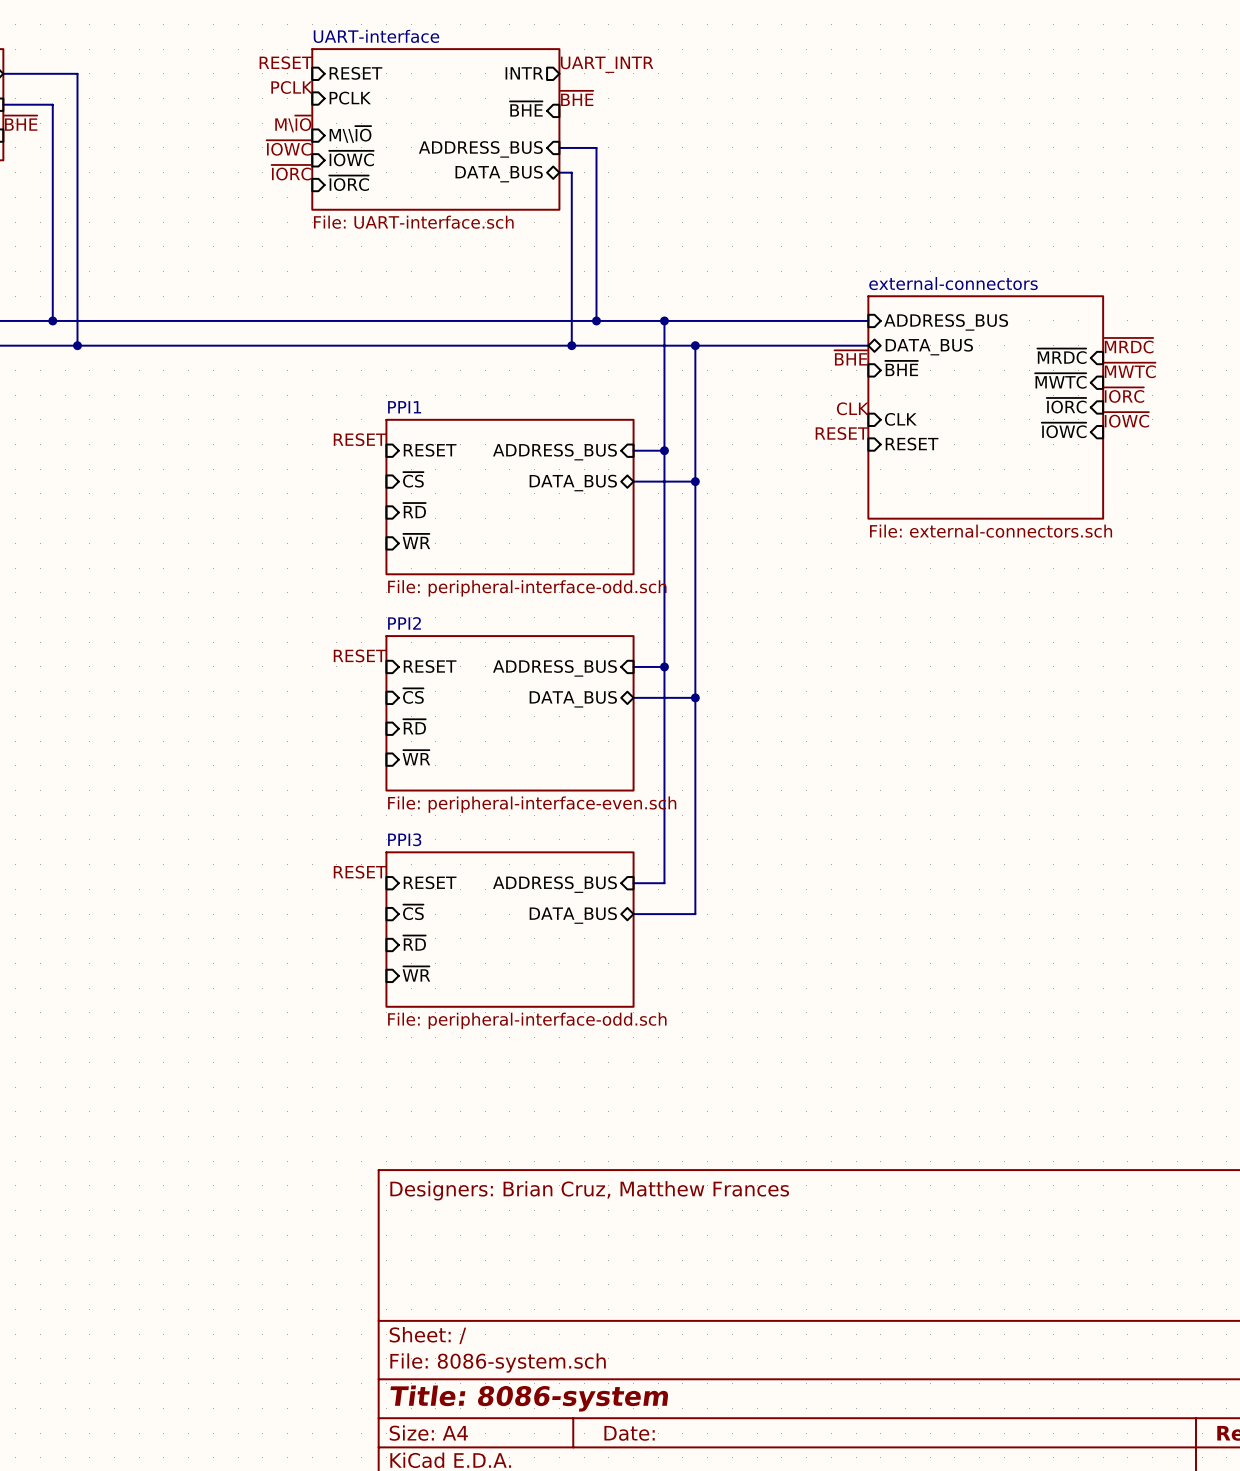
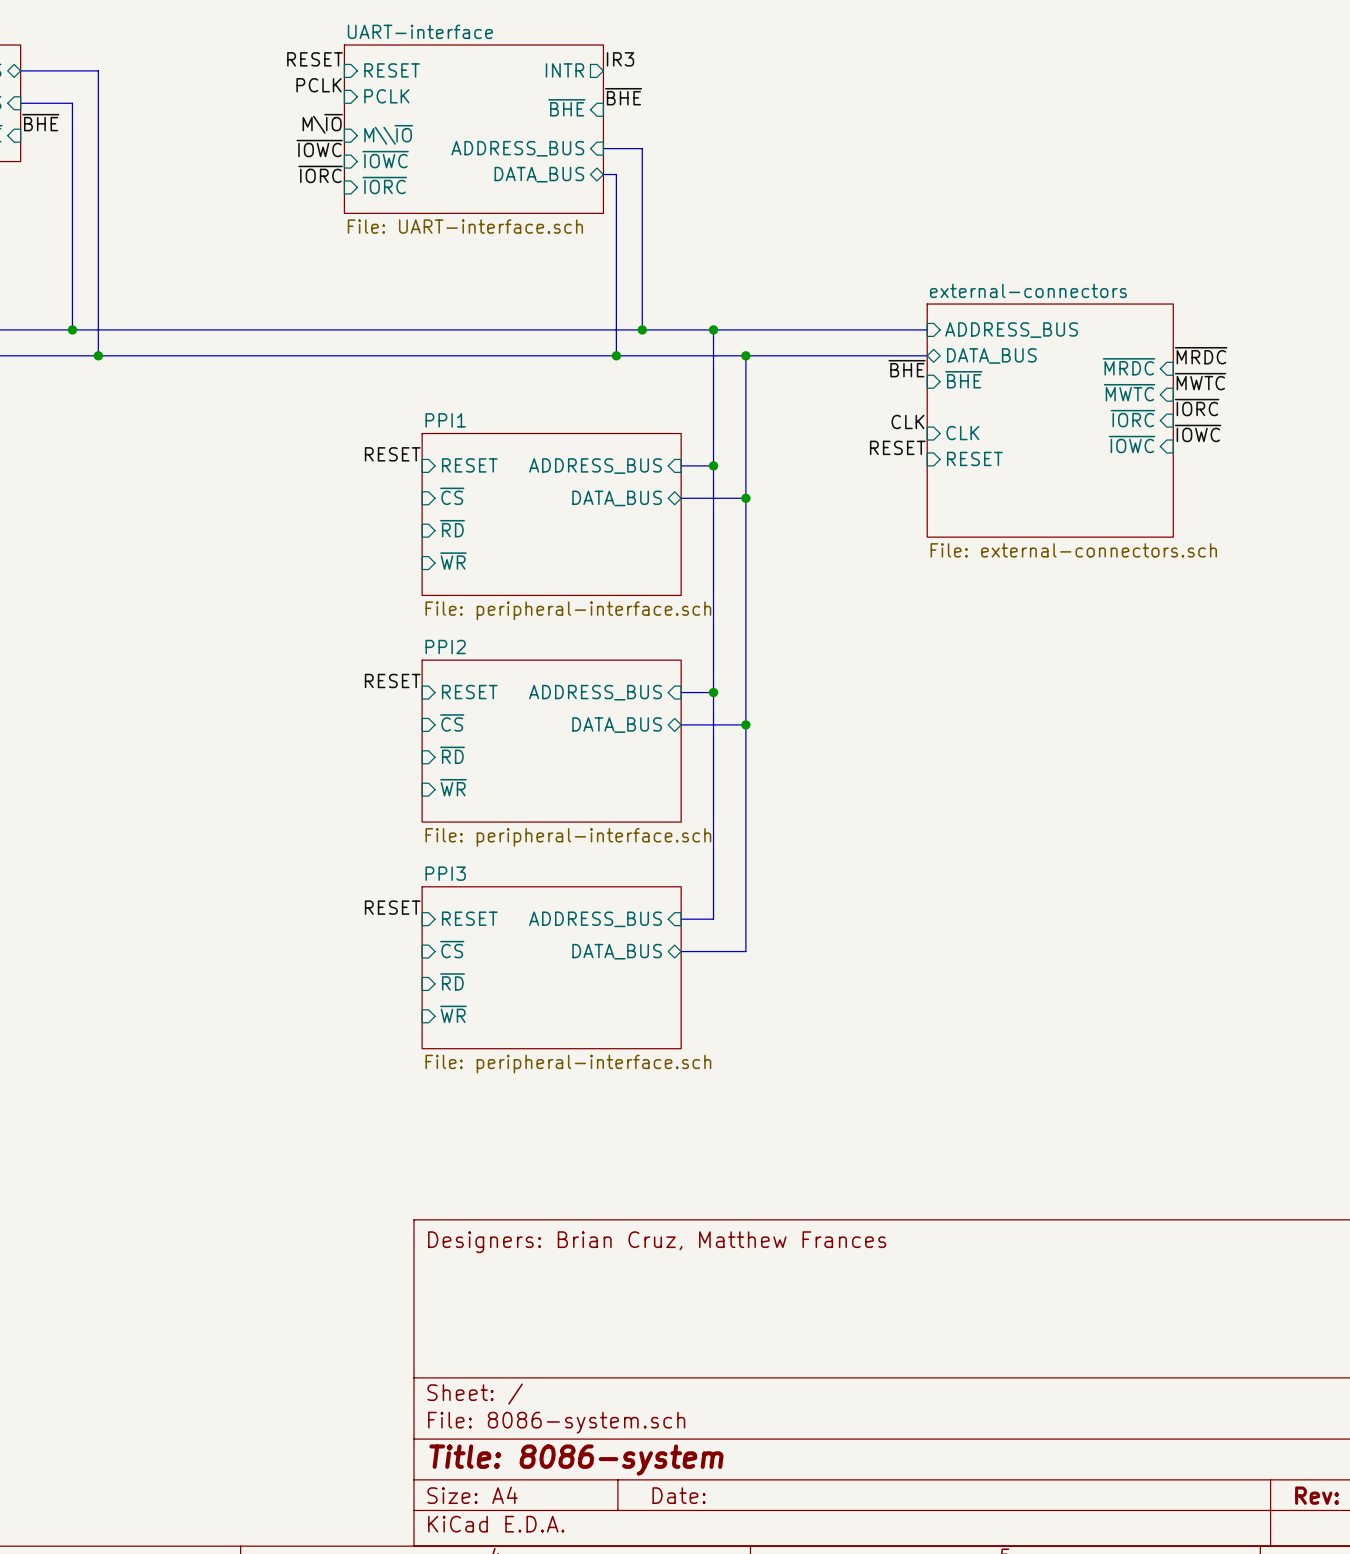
label: UART_INTR (607, 64) -> IR3 (620, 59)
sheet PPI1 value: File: peripheral-interface-odd.sch (527, 588) -> File: peripheral-interface.sch (568, 610)
sheet PPI2 value: File: peripheral-interface-even.sch (532, 804) -> File: peripheral-interface.sch (568, 837)
sheet PPI3 value: File: peripheral-interface-odd.sch (527, 1020) -> File: peripheral-interface.sch (568, 1064)

